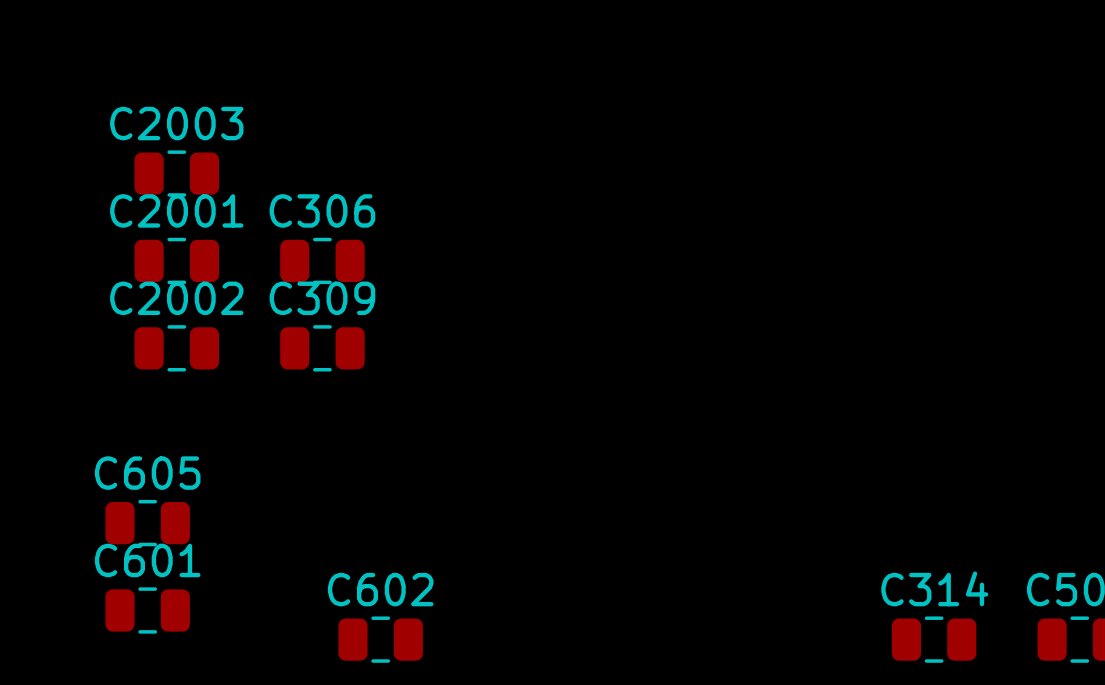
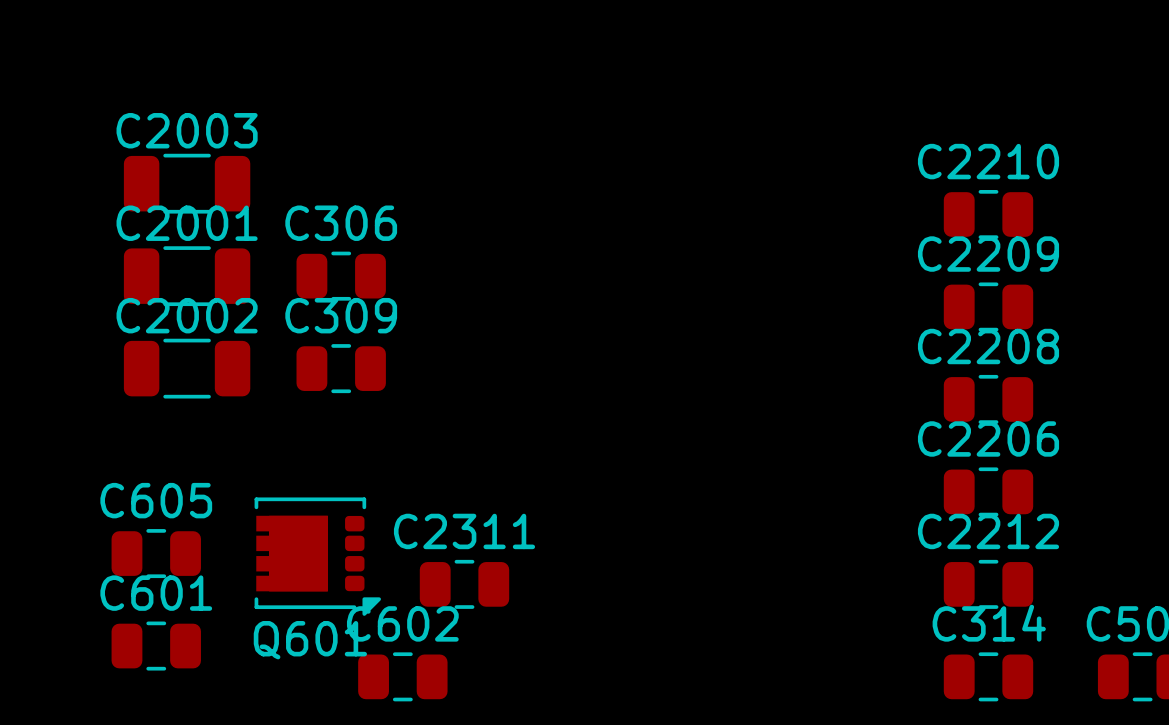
C2003 footprint: [134, 150, 220, 197] -> [123, 153, 251, 214]
C2210: none -> (988, 214)
C2001 footprint: [134, 237, 220, 285] -> [123, 246, 251, 307]
C2209: none -> (988, 306)
C2002 footprint: [134, 325, 220, 372] -> [123, 338, 251, 399]
C2208: none -> (988, 399)
C2206: none -> (988, 491)
Q601: none -> (317, 556)
C2311: none -> (464, 584)
C2212: none -> (988, 584)

